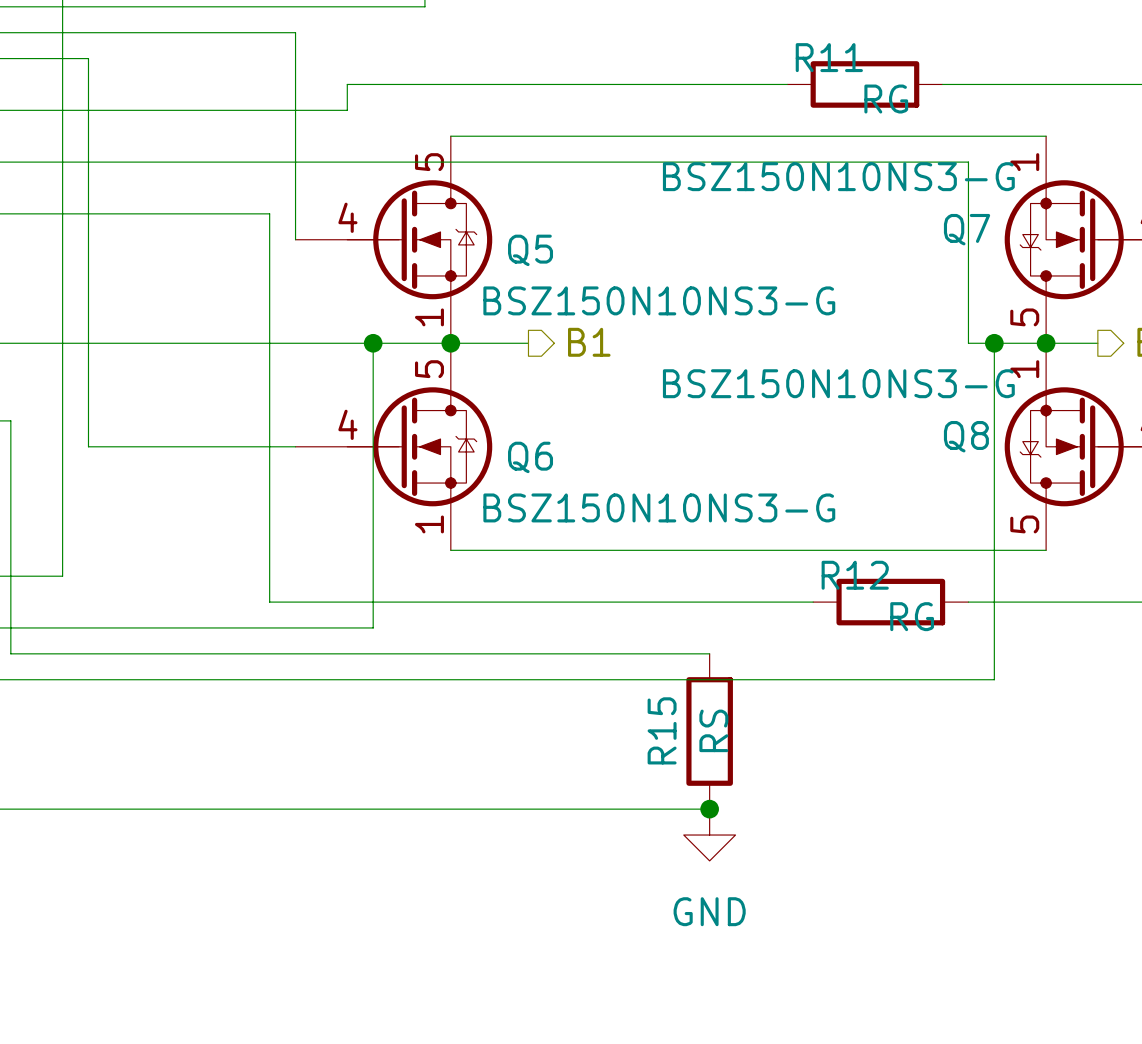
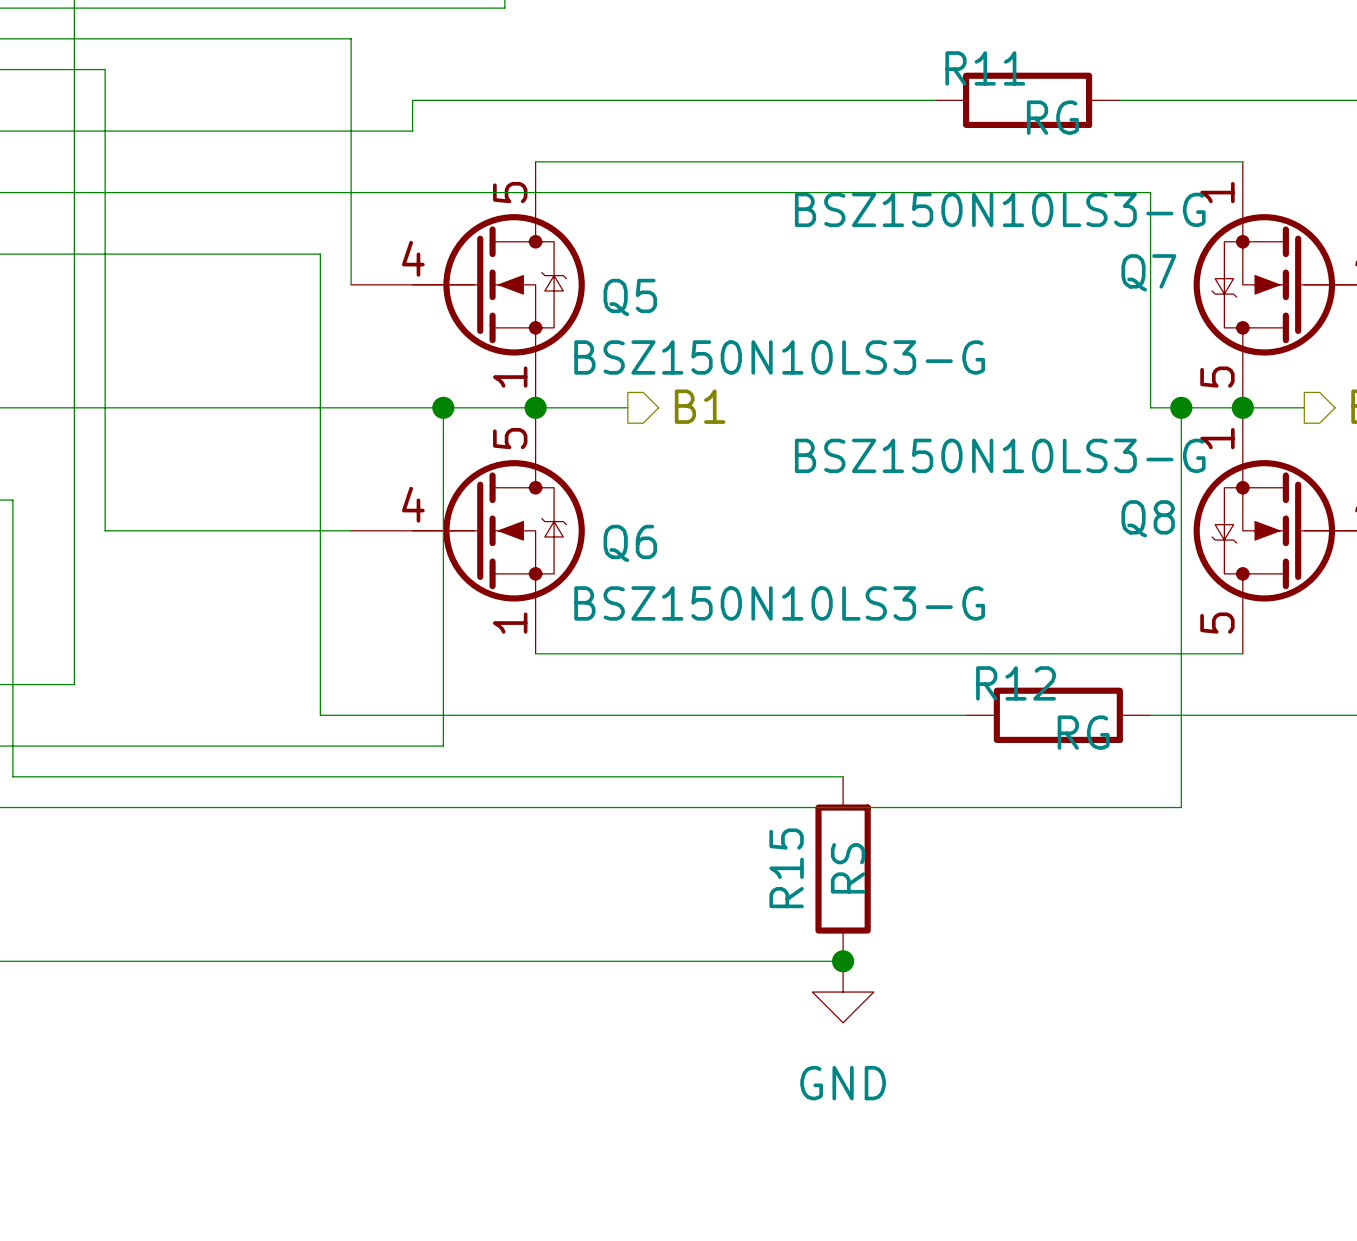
Q7 value: BSZ150N10NS3-G (838, 176) -> BSZ150N10LS3-G (1000, 209)
Q5 value: BSZ150N10NS3-G (659, 300) -> BSZ150N10LS3-G (779, 357)
Q8 value: BSZ150N10NS3-G (838, 383) -> BSZ150N10LS3-G (1000, 455)
Q6 value: BSZ150N10NS3-G (659, 507) -> BSZ150N10LS3-G (779, 603)

